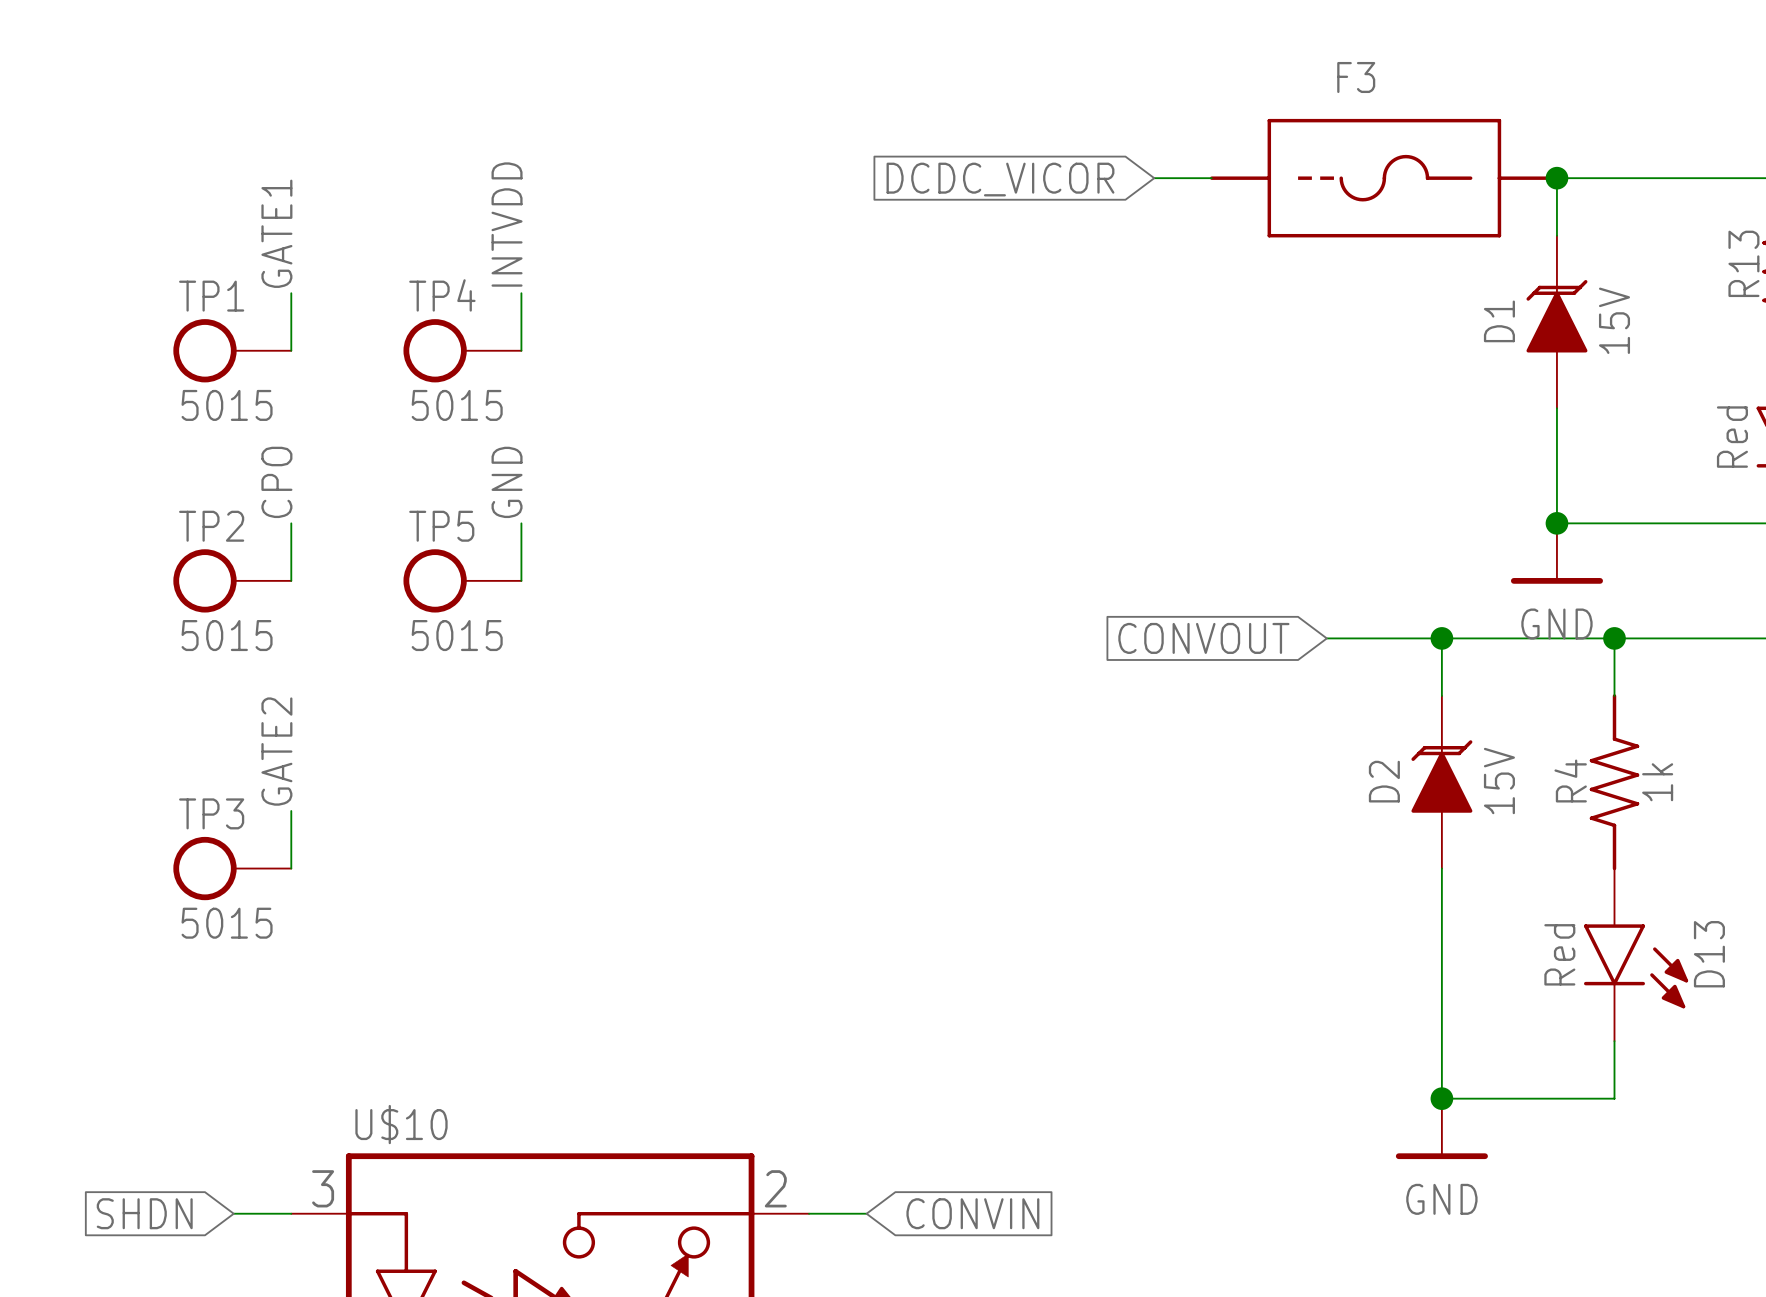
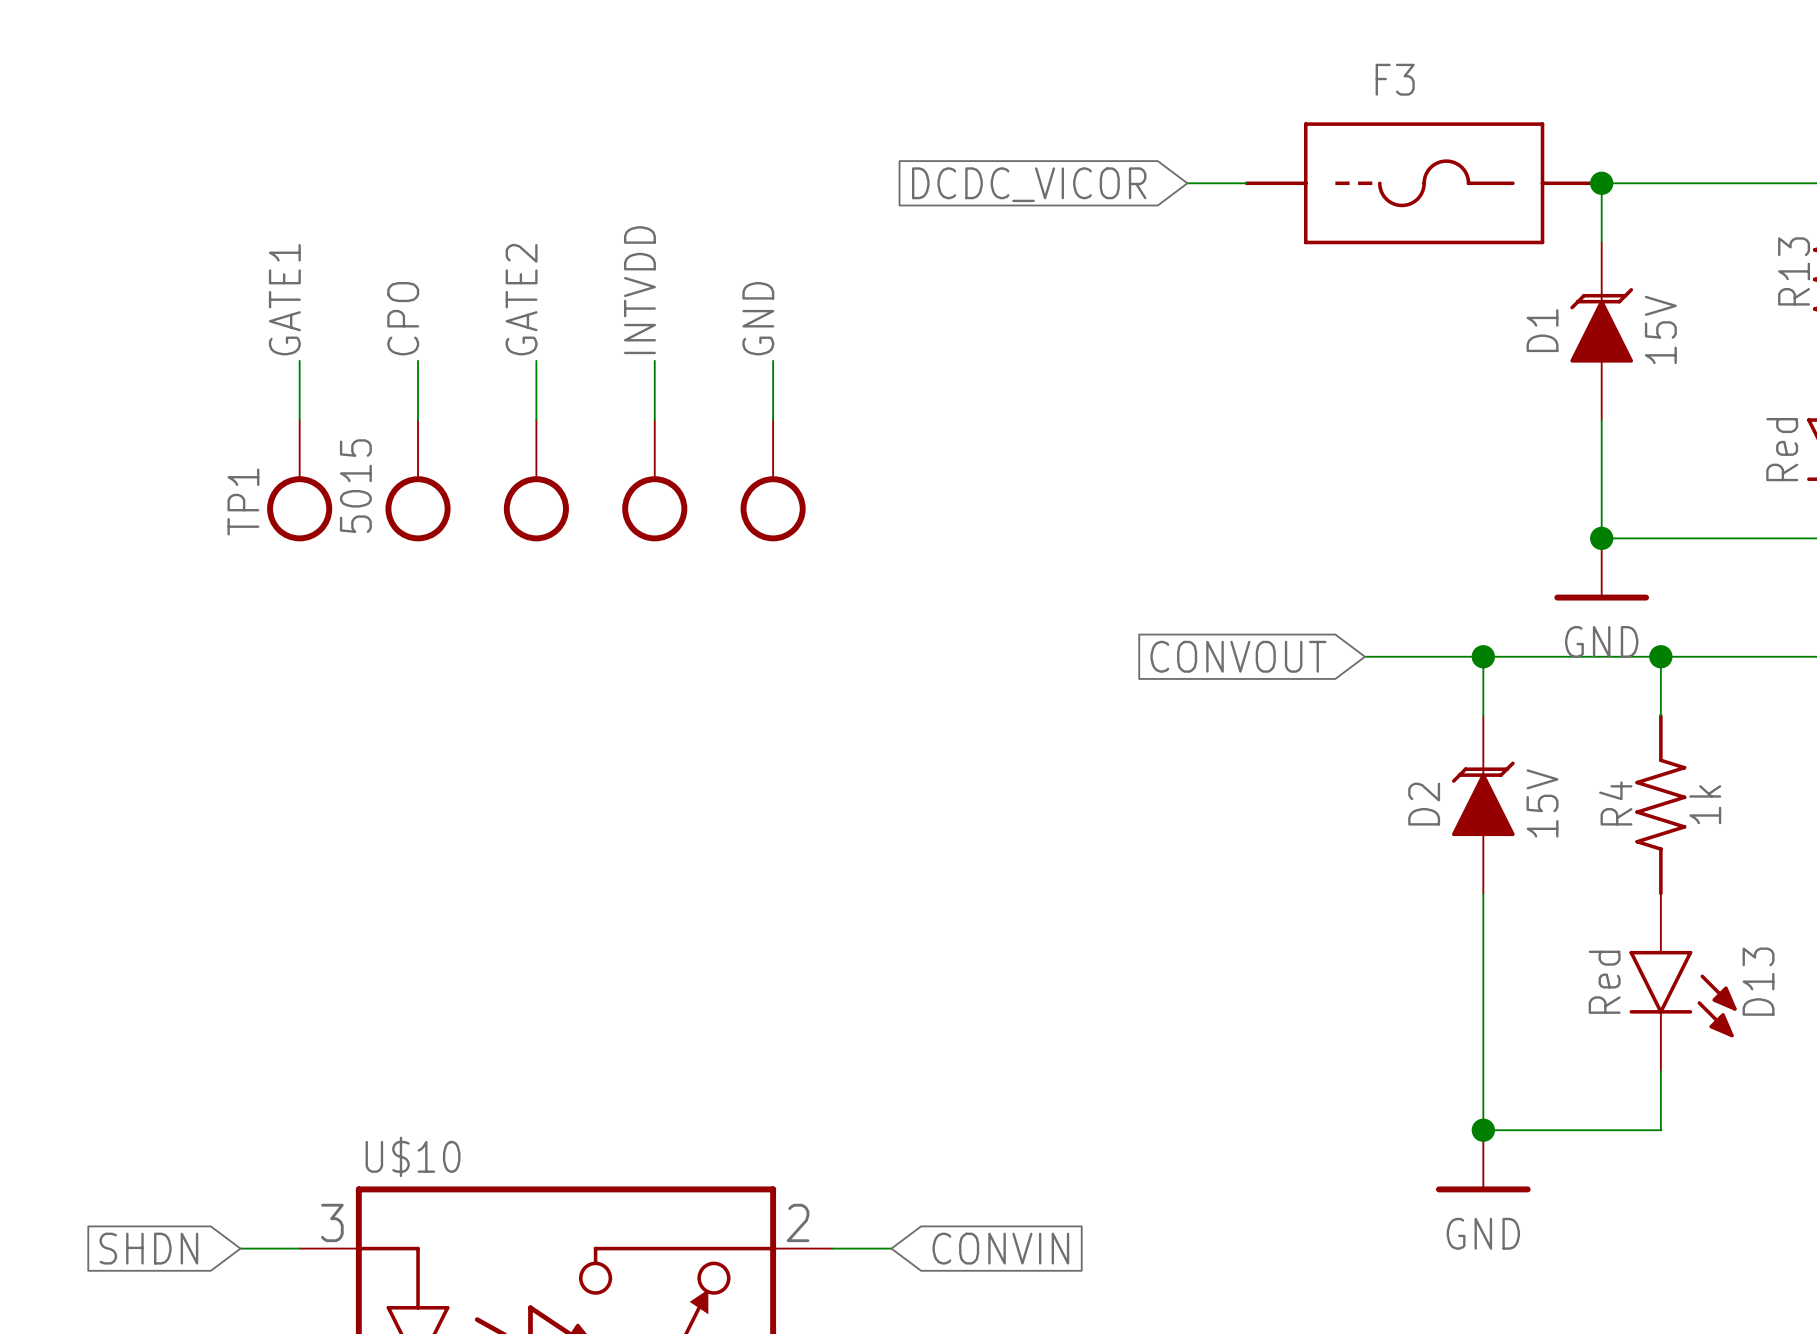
label position: INTVDD (507, 224) -> INTVDD (639, 290)
label position: GATE1 (276, 233) -> GATE1 (284, 299)
wire: (291, 293) (291, 350) -> (299, 420) (299, 360)
wire: (521, 293) (521, 350) -> (536, 420) (536, 360)
TP1 rotation: 0° (204, 350) -> 90° counterclockwise (299, 508)
TP1 position: (232, 350) -> (299, 480)
TP4: (462, 350) -> none
wire: none -> (773, 360) (773, 420)
part: none -> (418, 480)
part: none -> (536, 480)
part: none -> (654, 480)
part: none -> (773, 480)
label position: CPO (276, 482) -> CPO (403, 318)
label position: GND (507, 482) -> GND (758, 318)
wire: (291, 523) (291, 580) -> (418, 360) (418, 420)
wire: (521, 523) (521, 580) -> (654, 360) (654, 420)
TP2: (232, 580) -> none
TP5: (462, 580) -> none
label position: GATE2 (276, 751) -> GATE2 (521, 299)
wire: (291, 811) (291, 868) -> none
TP3: (232, 868) -> none

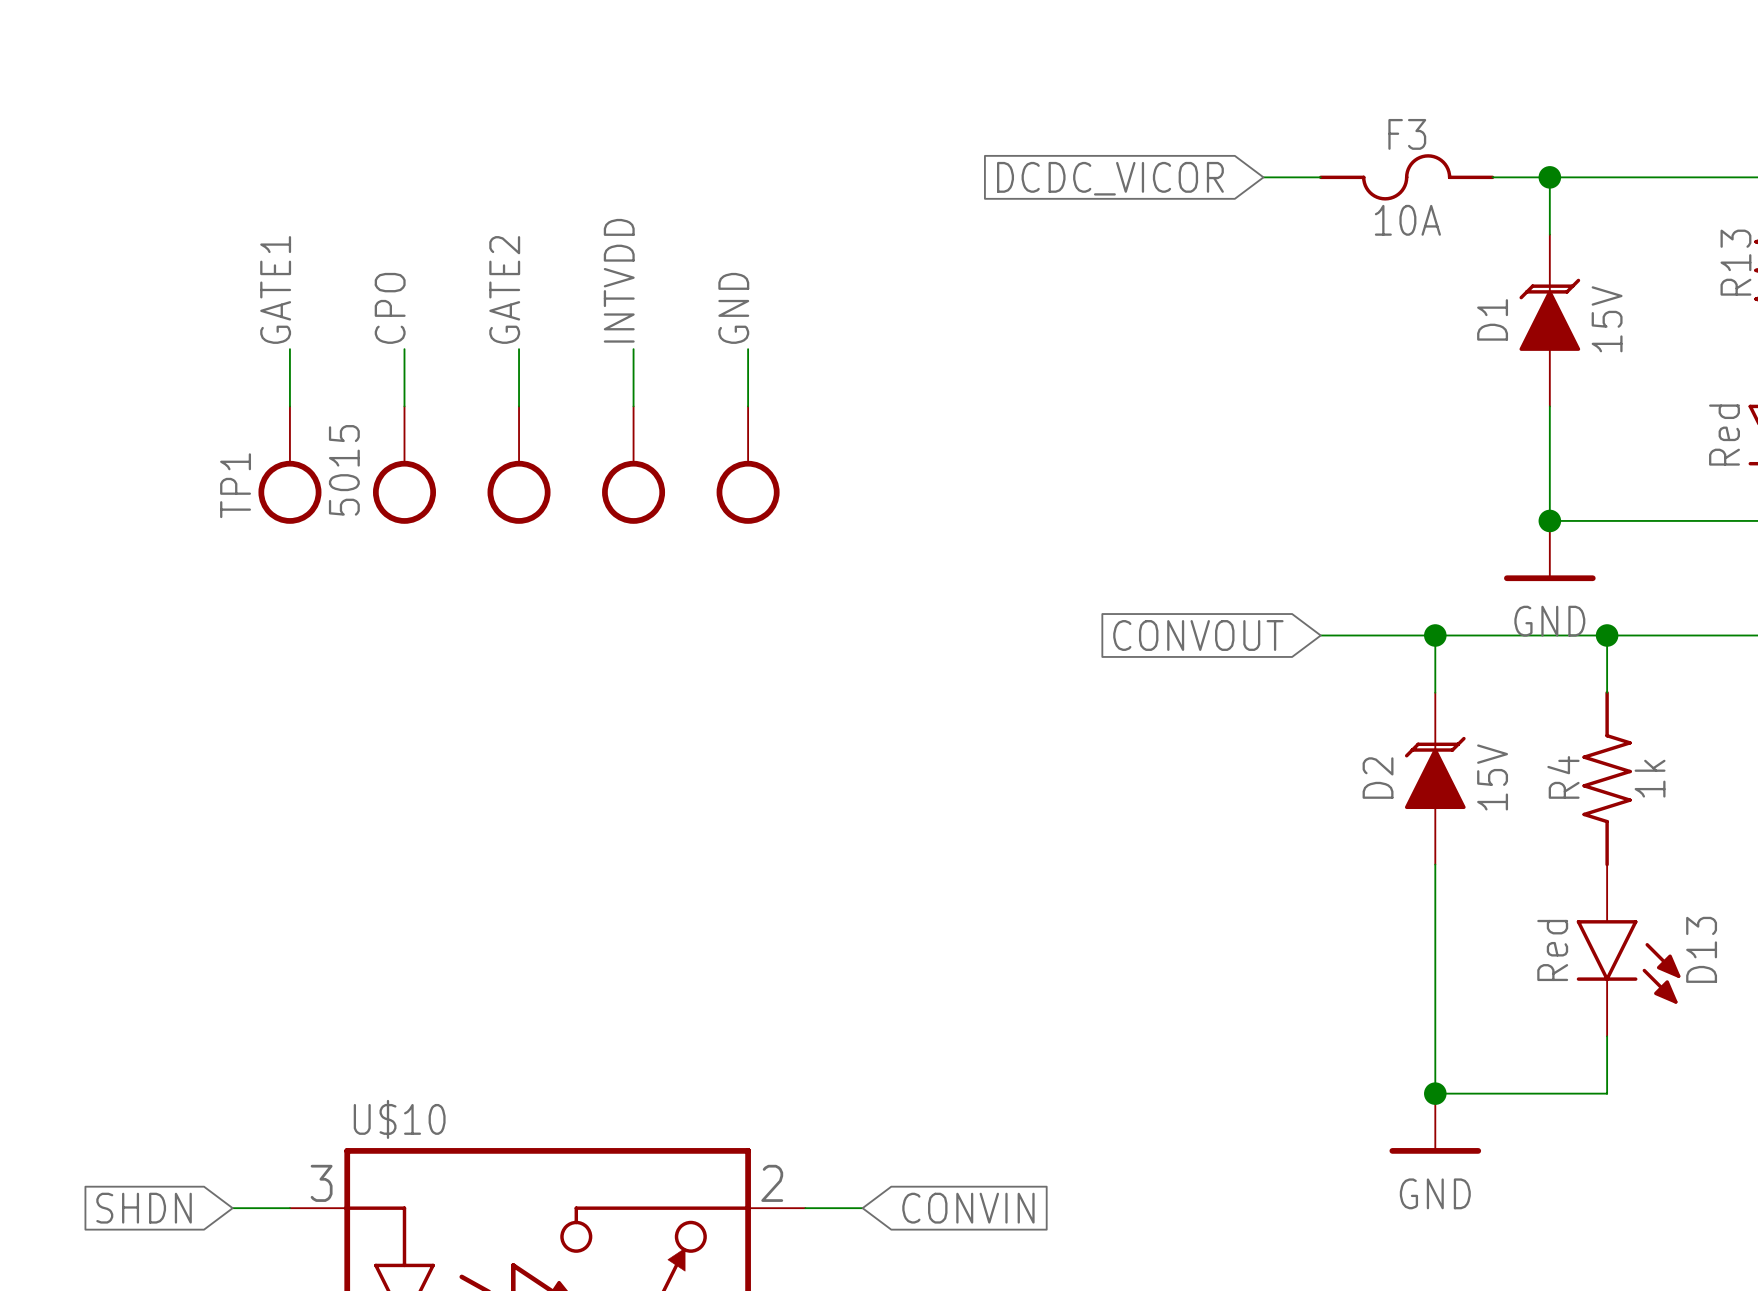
F3 name position: F3 (1395, 79) -> F3 (1407, 134)
F3 symbol: [1244, 122, 1604, 245] -> [1319, 154, 1495, 201]
wire: (1187, 183) (1246, 183) -> (1263, 177) (1320, 177)
global label position: DCDC_VICOR (1029, 184) -> DCDC_VICOR (1110, 178)
F3 text: none -> 10A (1407, 220)

